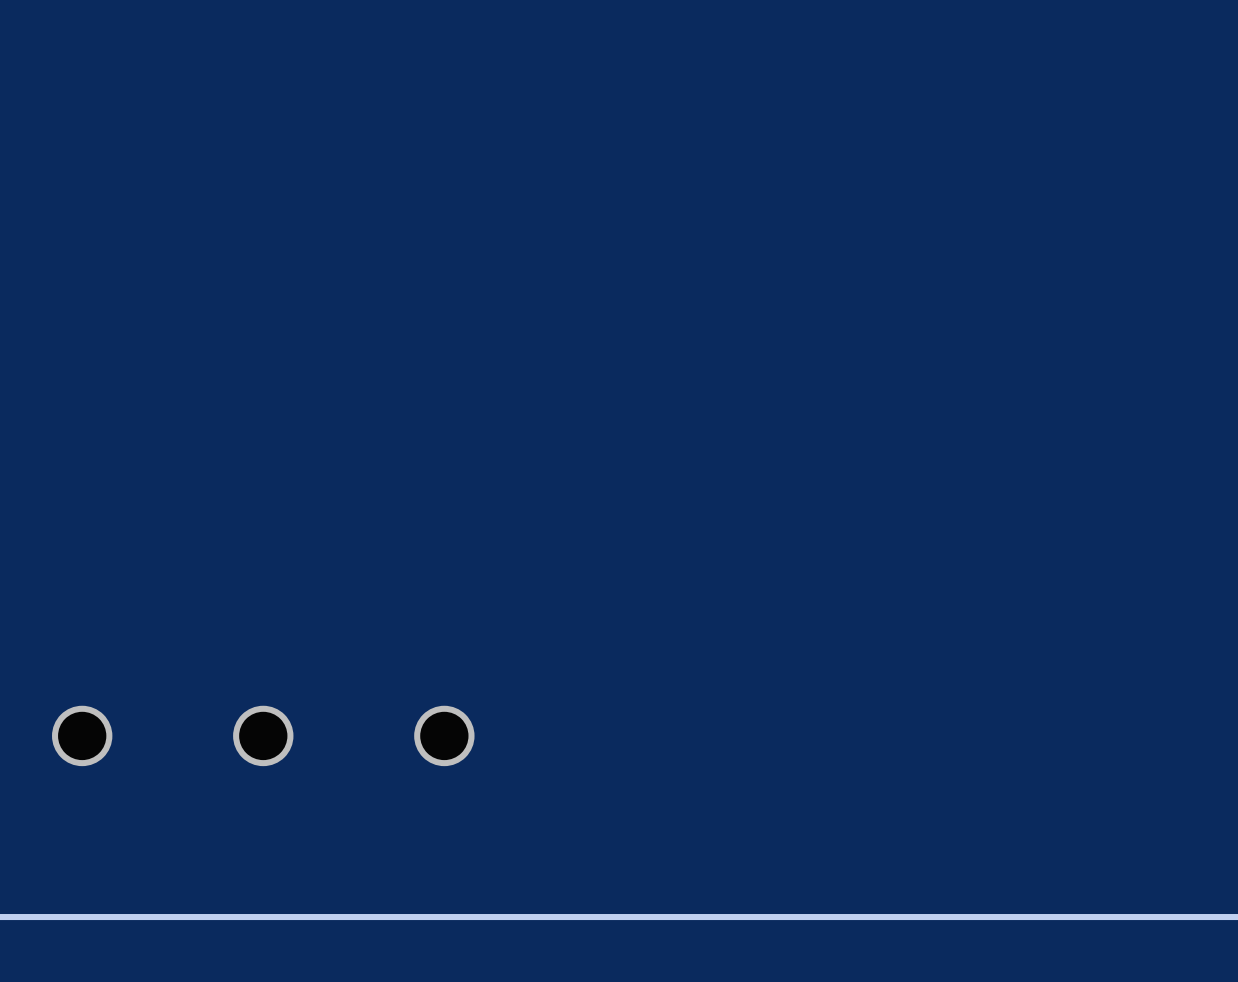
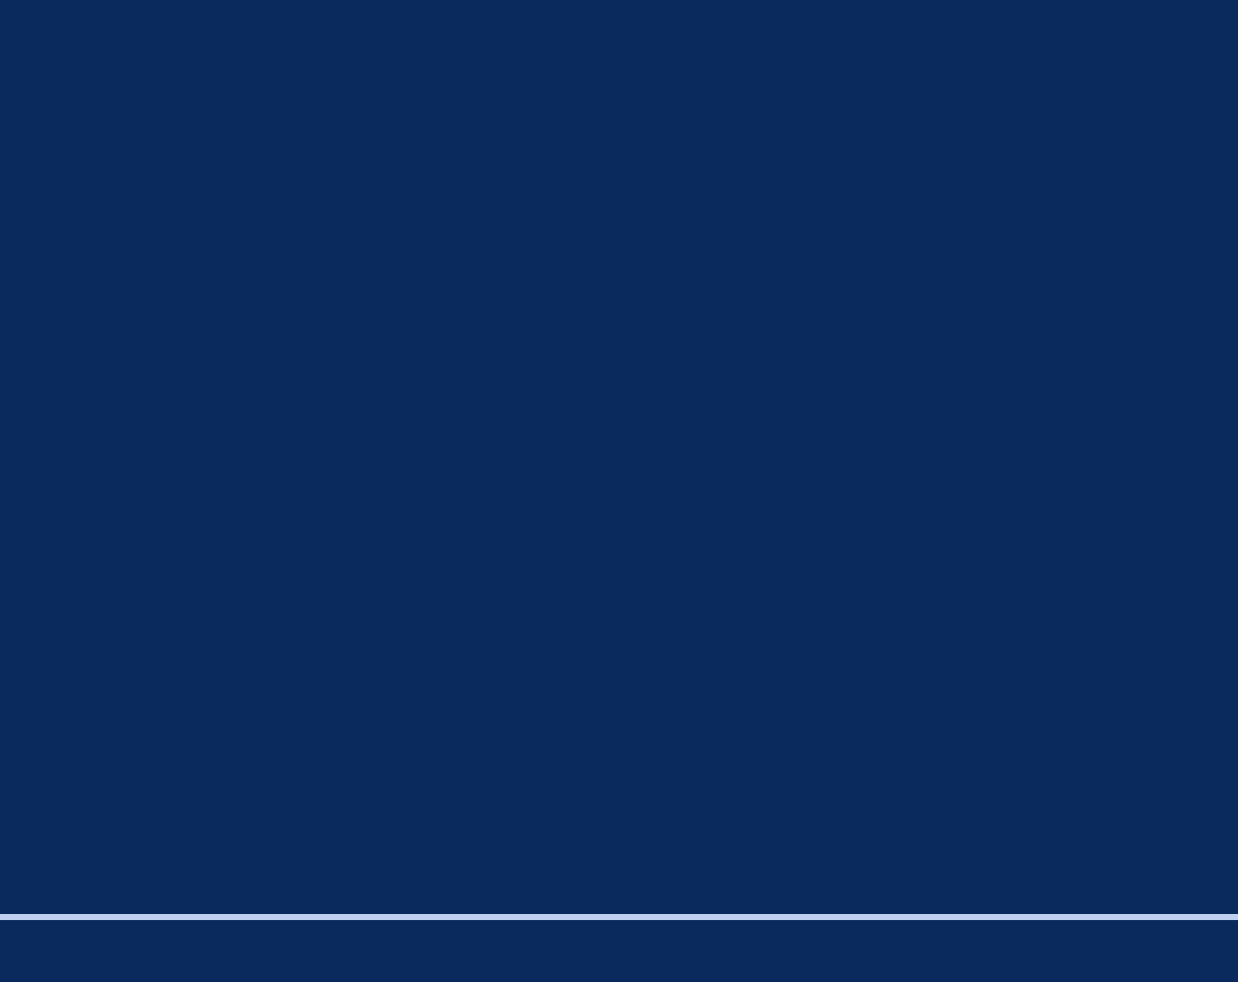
via: (82, 735) -> none
via: (263, 735) -> none
via: (444, 735) -> none

